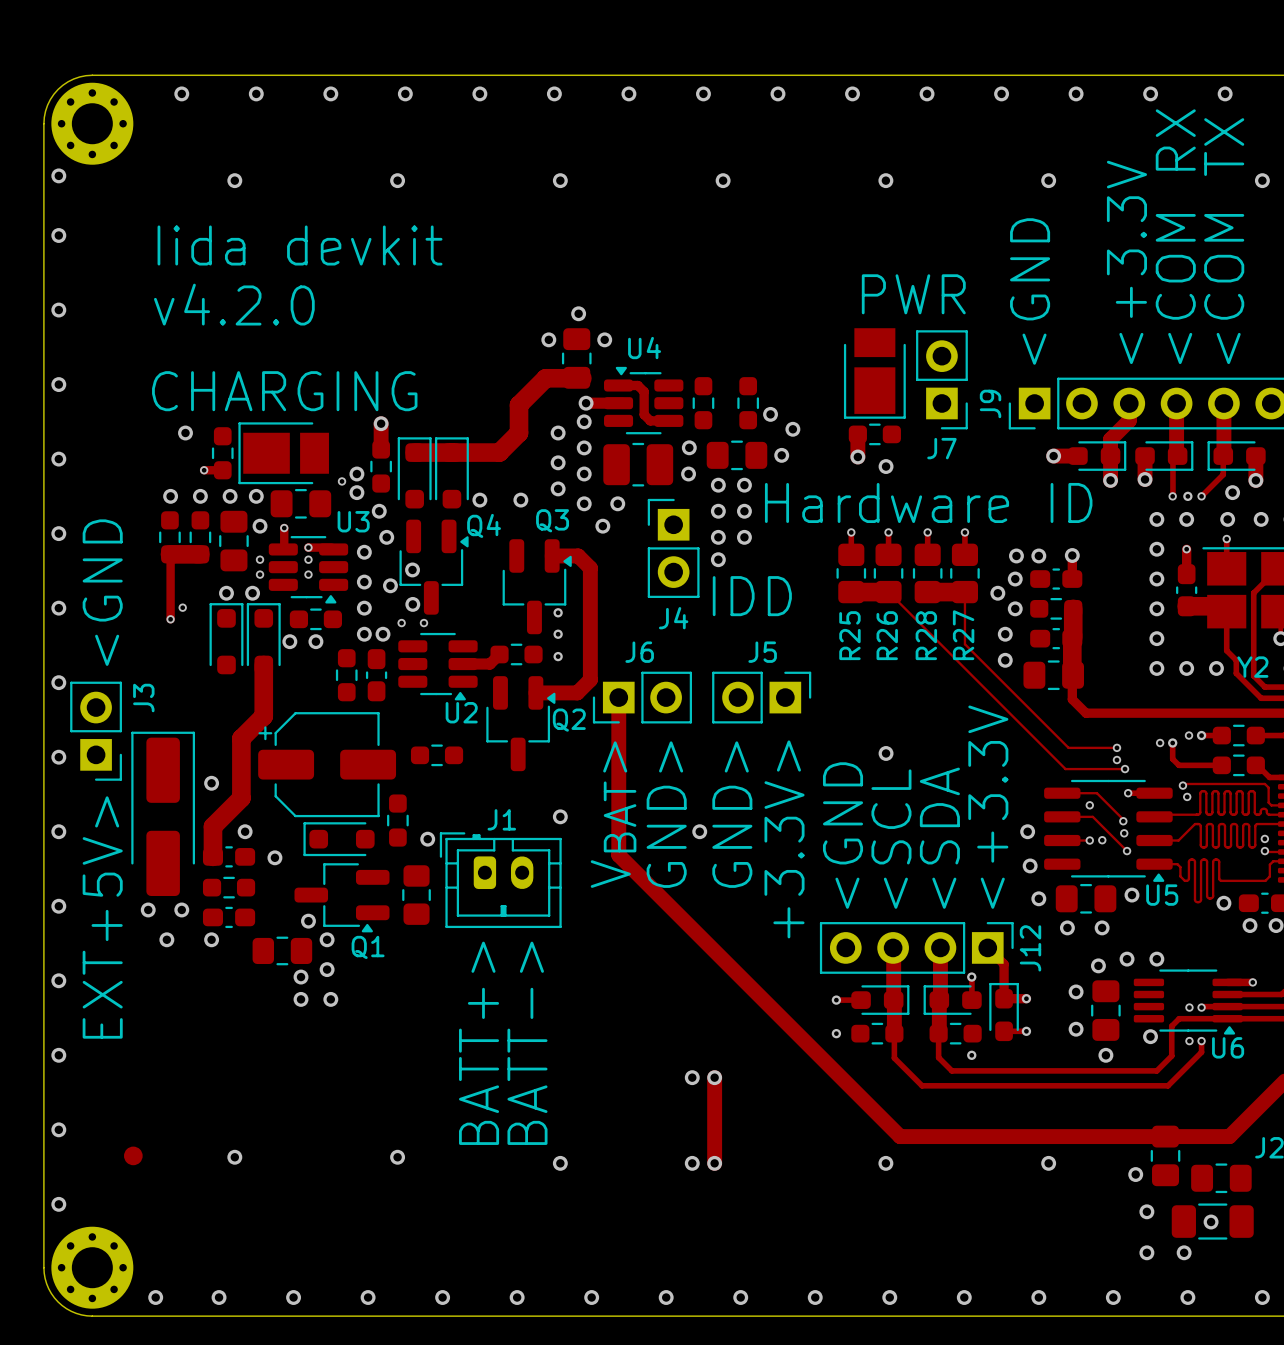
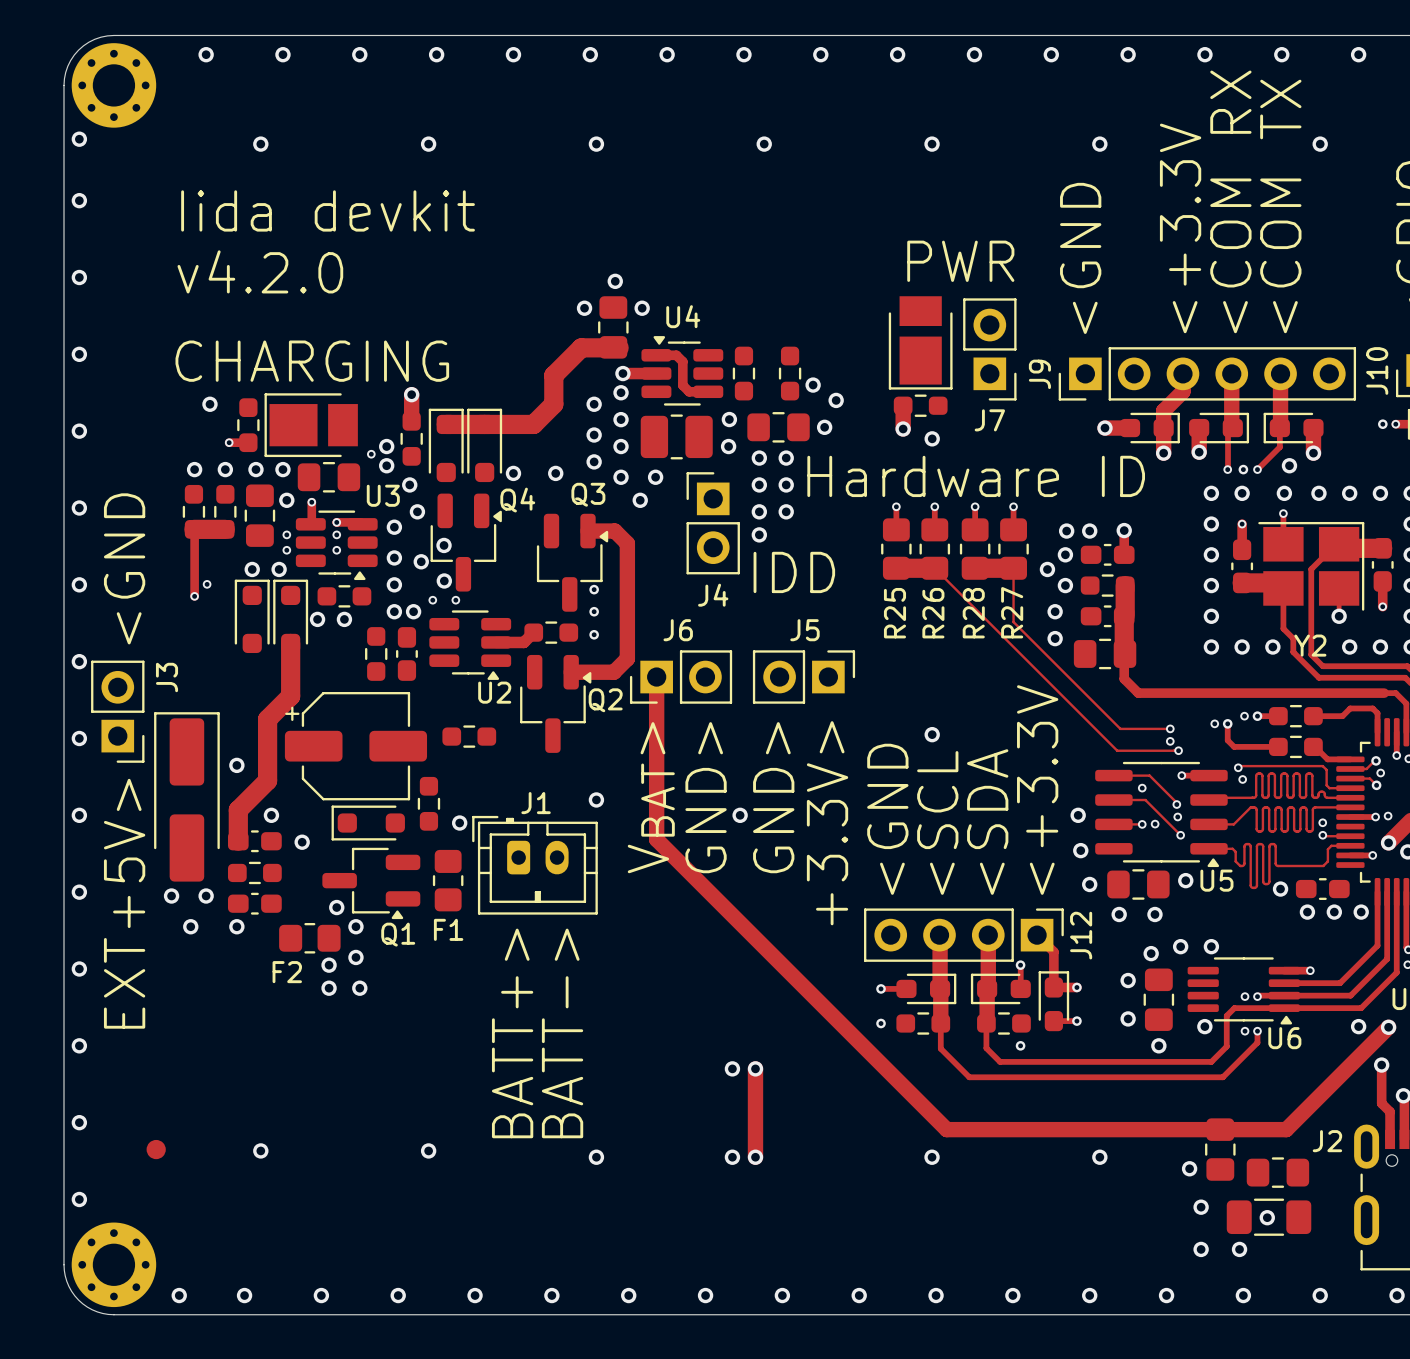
part: (416, 895) -> none
F1: none -> (448, 880)
part: (282, 950) -> none
F2: none -> (309, 938)

